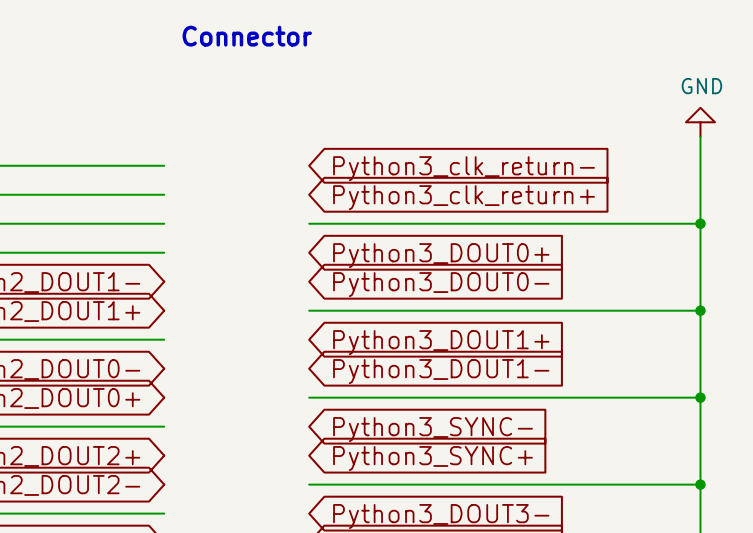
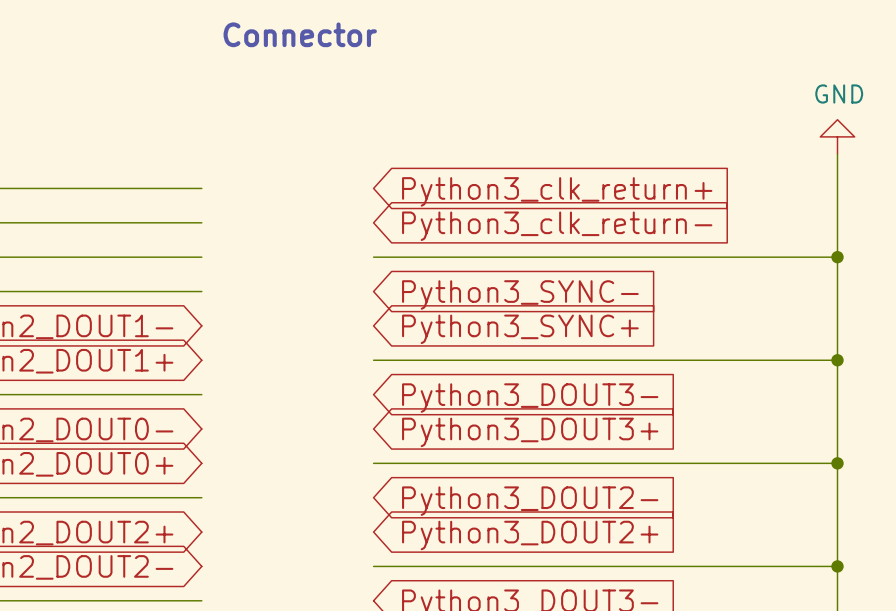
global label: Python3_clk_return- (464, 168) -> Python3_clk_return+ (557, 191)
global label: Python3_clk_return+ (464, 197) -> Python3_clk_return- (557, 226)
global label: Python3_DOUT0+ (441, 255) -> Python3_SYNC- (520, 294)
global label: Python3_DOUT0- (441, 284) -> Python3_SYNC+ (520, 329)
global label: Python3_DOUT1+ (441, 342) -> Python3_DOUT3- (530, 398)
global label: Python3_DOUT1- (441, 371) -> Python3_DOUT3+ (530, 432)
global label: Python3_SYNC- (432, 429) -> Python3_DOUT2- (530, 501)
global label: Python3_SYNC+ (432, 458) -> Python3_DOUT2+ (530, 535)

